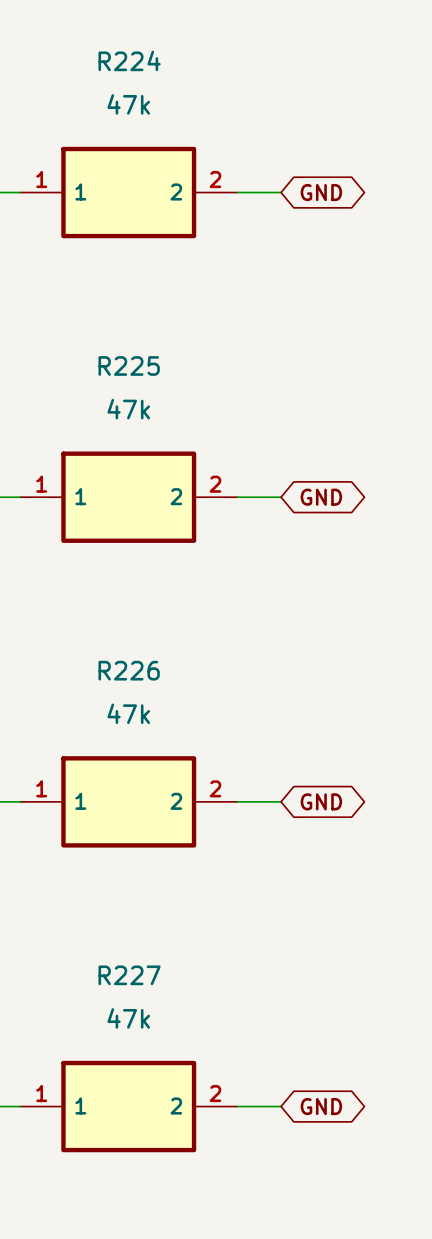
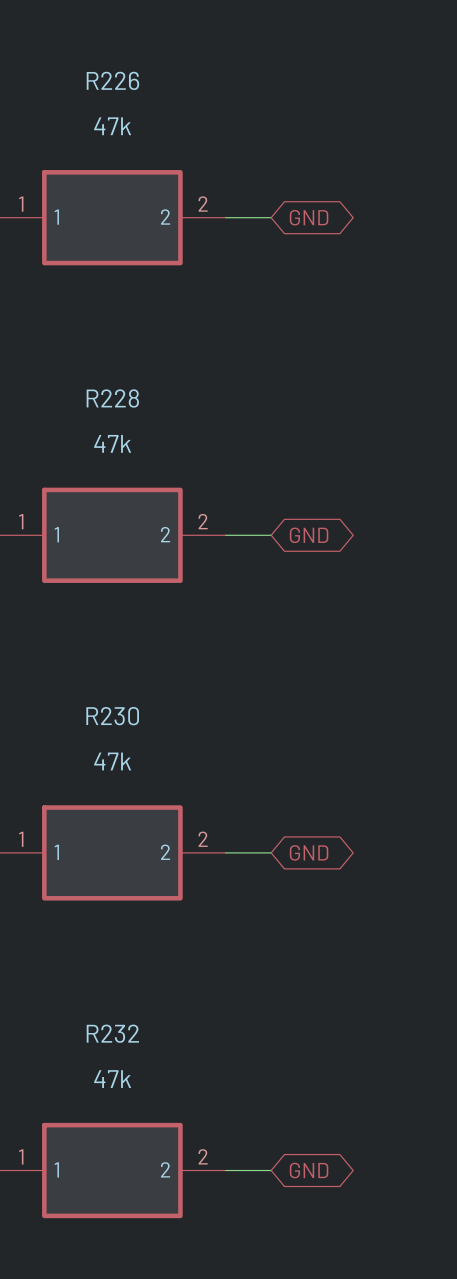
R224 name: R224 (129, 60) -> R226 (112, 80)
R225 name: R225 (129, 365) -> R228 (112, 398)
R226 name: R226 (129, 670) -> R230 (112, 716)
R227 name: R227 (129, 975) -> R232 (112, 1033)

